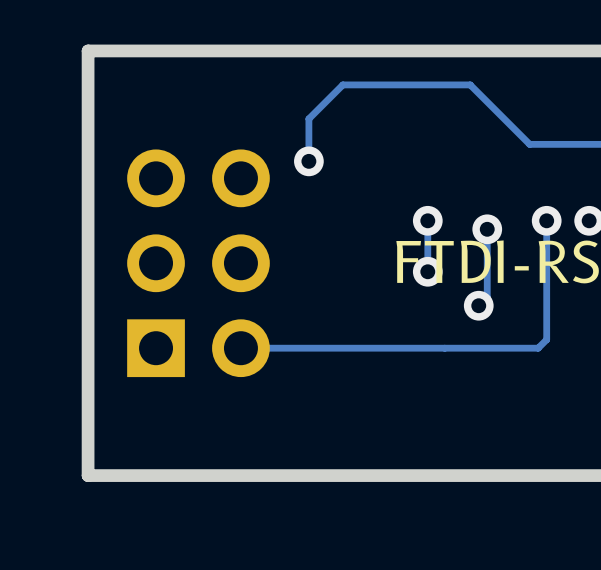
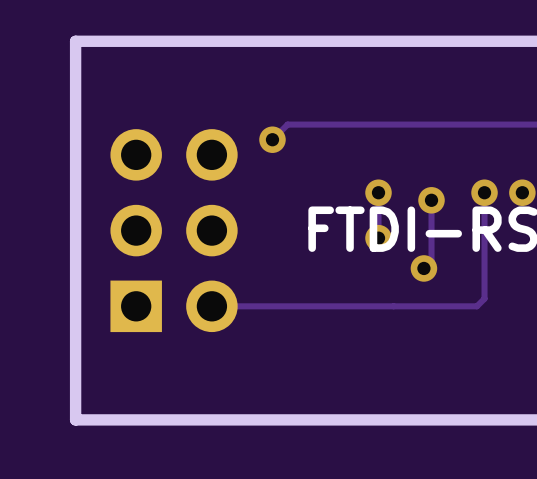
track: (529, 144) (470, 84) (342, 84) (308, 118) (308, 161) -> (469, 124) (287, 124) (272, 139)

